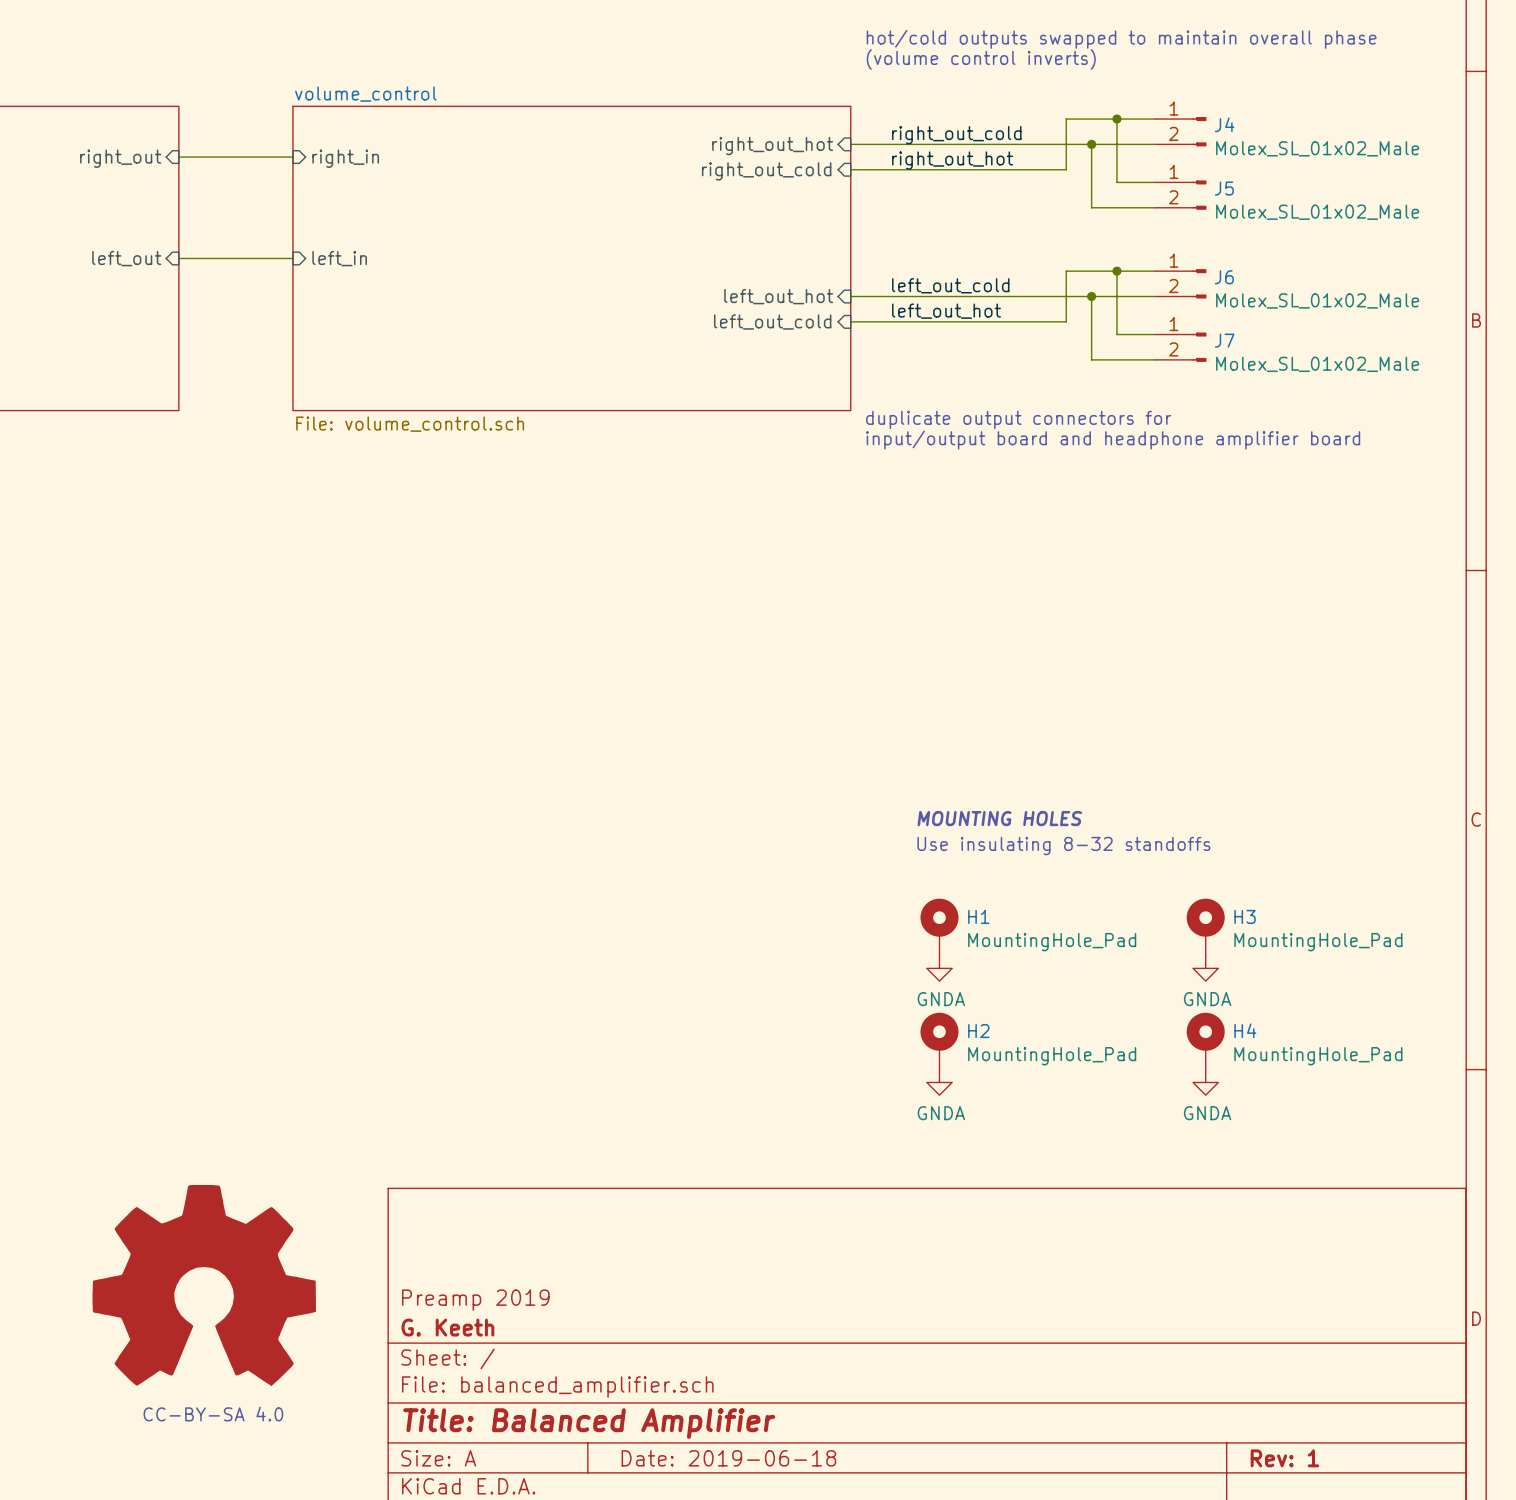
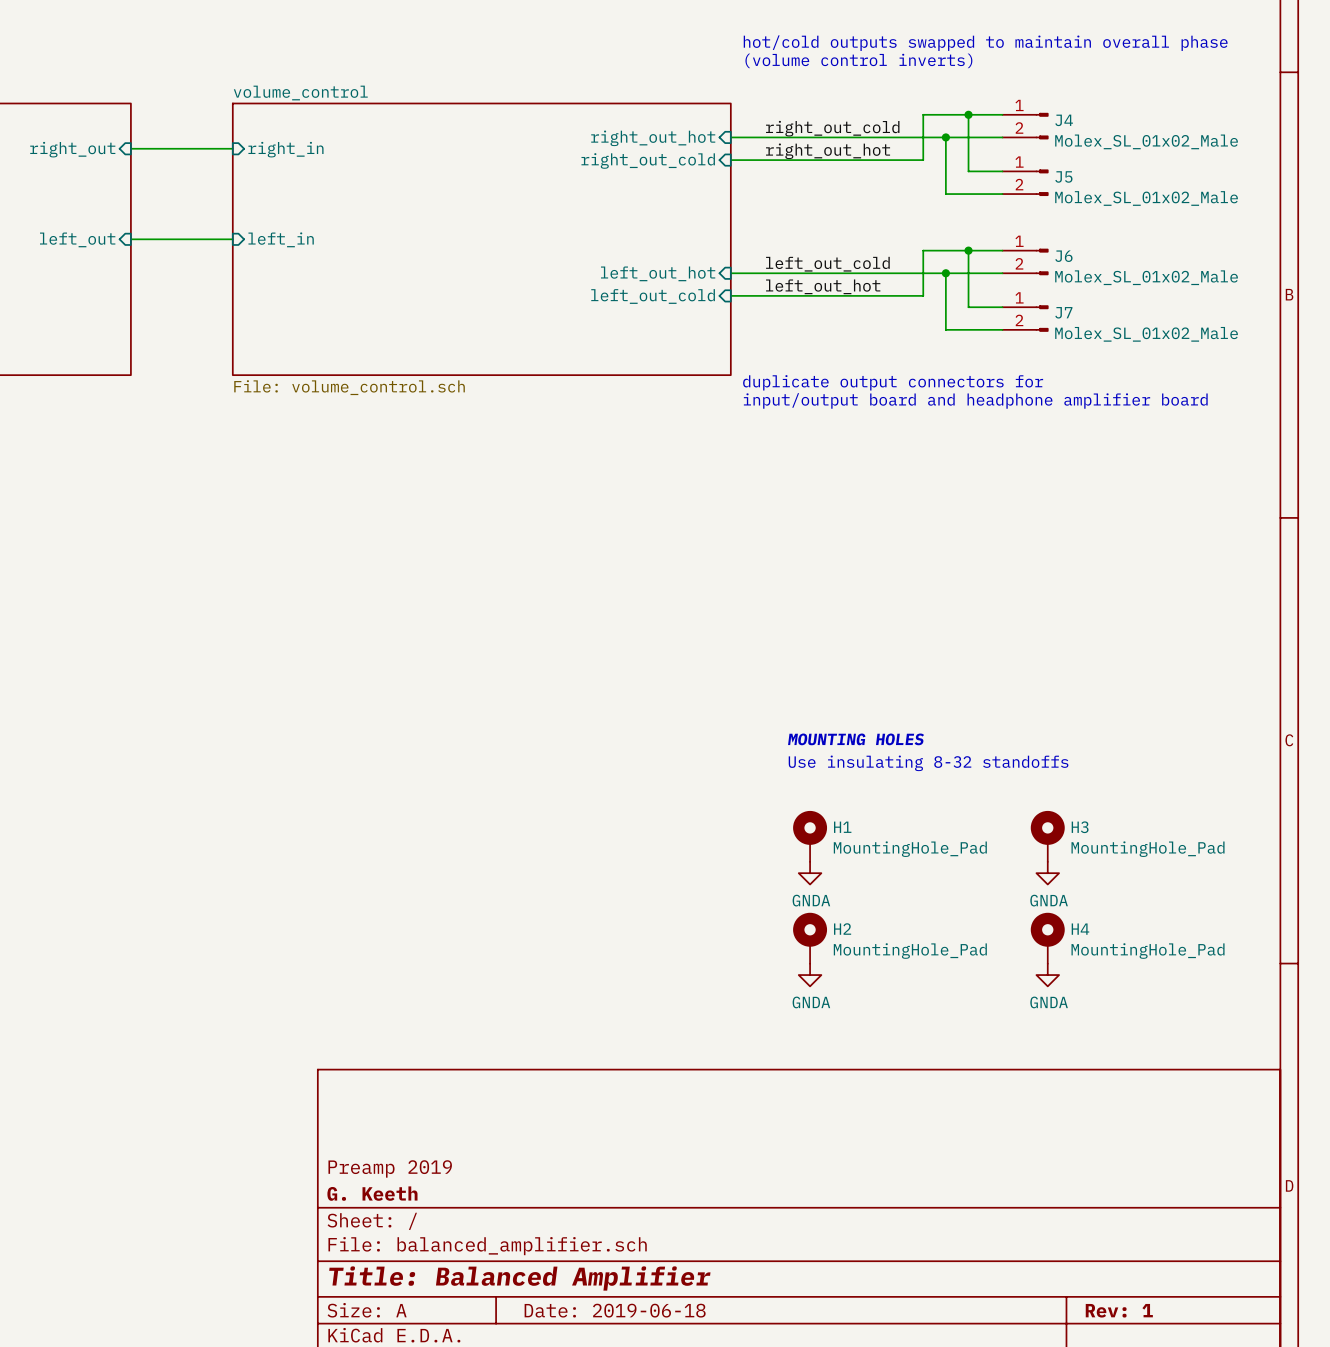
power symbol: (204, 1285) -> none
text: CC-BY-SA 4.0 (213, 1414) -> none

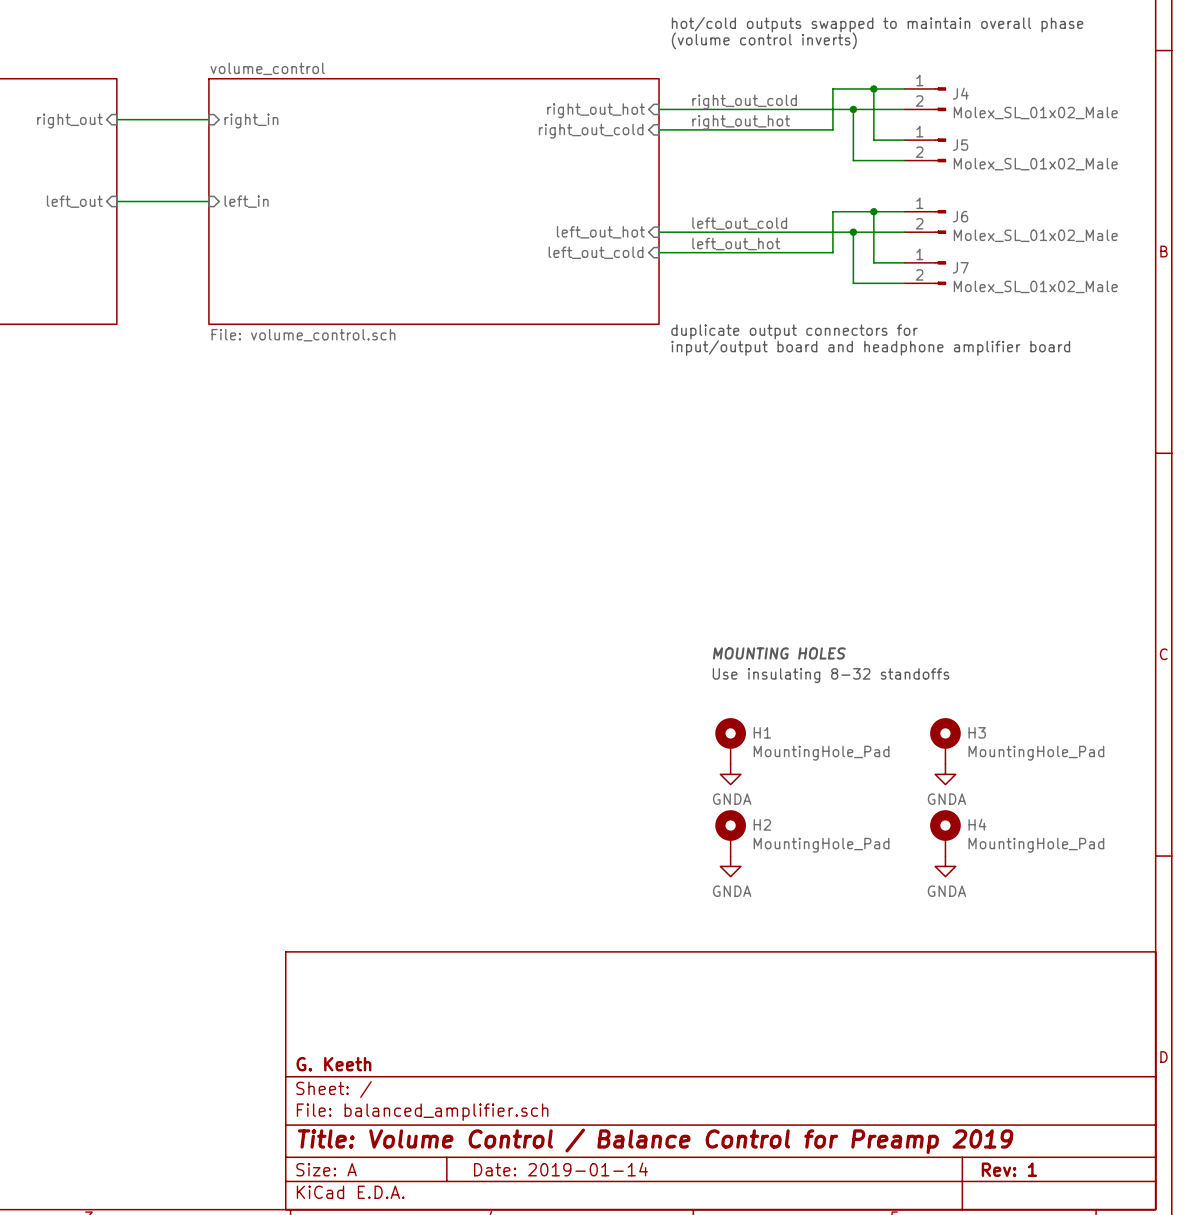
title block: Preamp 2019 (390, 1168) -> none
title block: Title: Balanced Amplifier (519, 1278) -> Title: Volume Control / Balance Control for Preamp 2019 (655, 1141)
title block: Date: 2019-06-18 (615, 1310) -> Date: 2019-01-14 (561, 1169)

